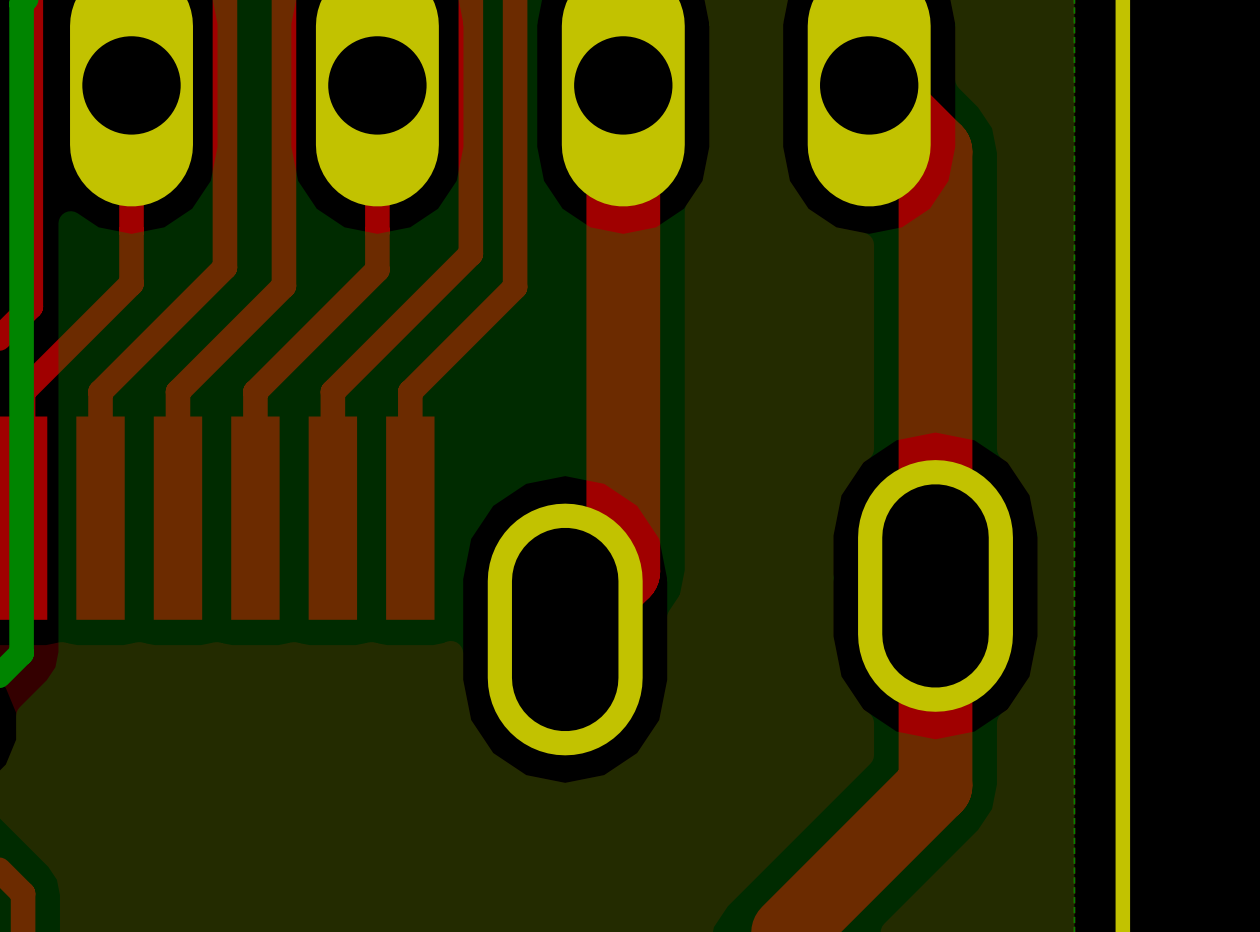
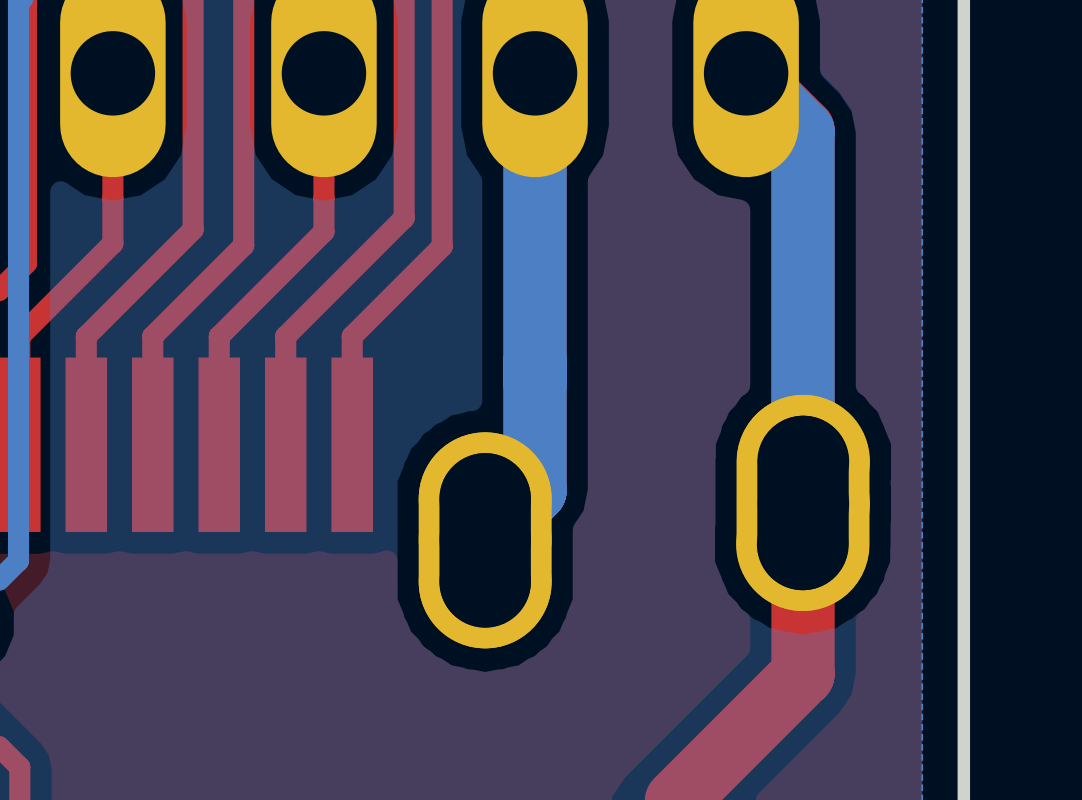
bottom track: none -> (535, 73) (535, 490) (485, 540)
bottom track: none -> (746, 74) (803, 131) (803, 502)

